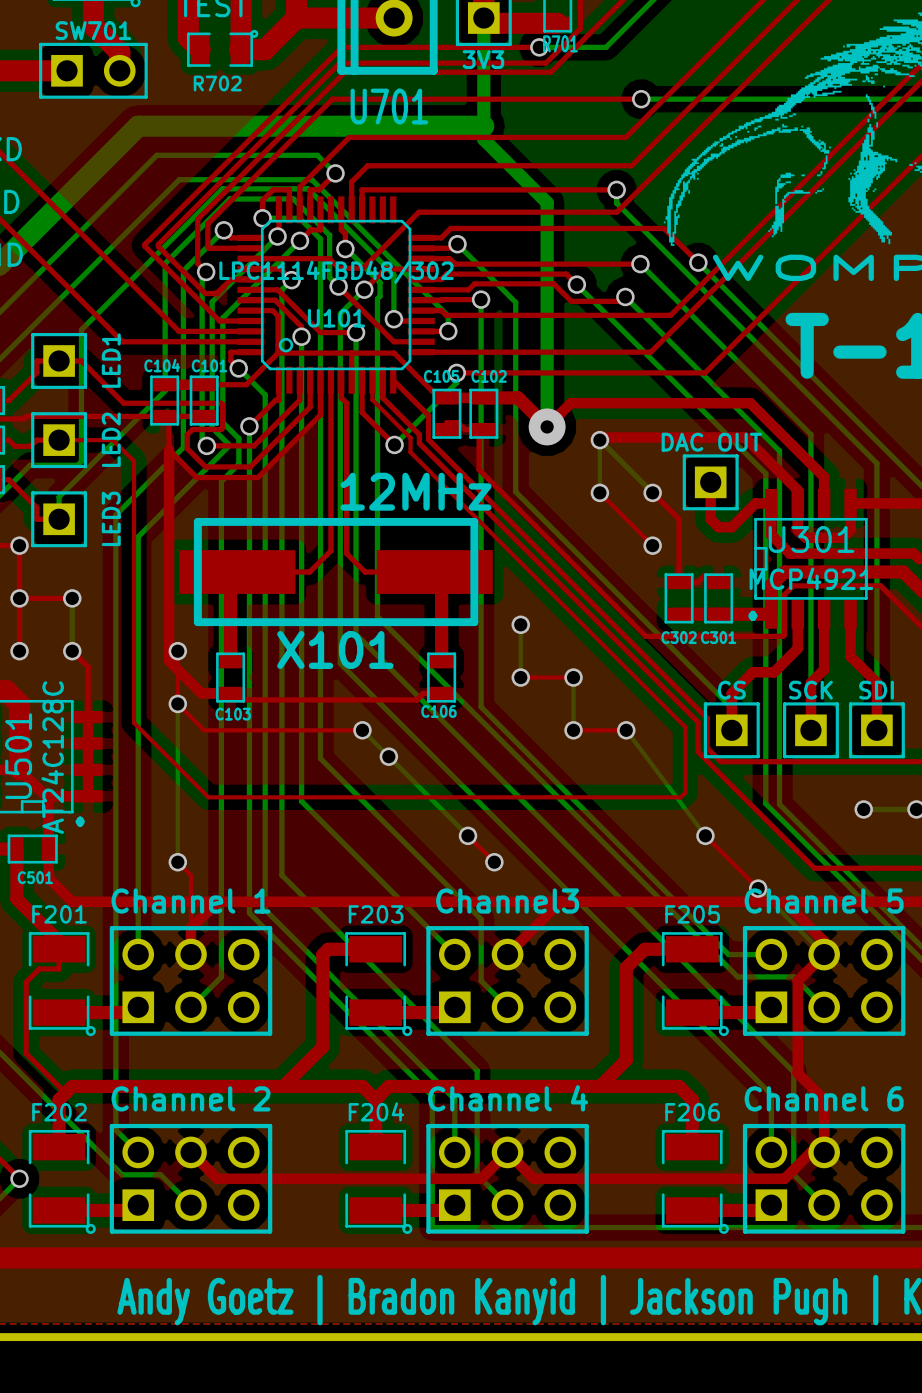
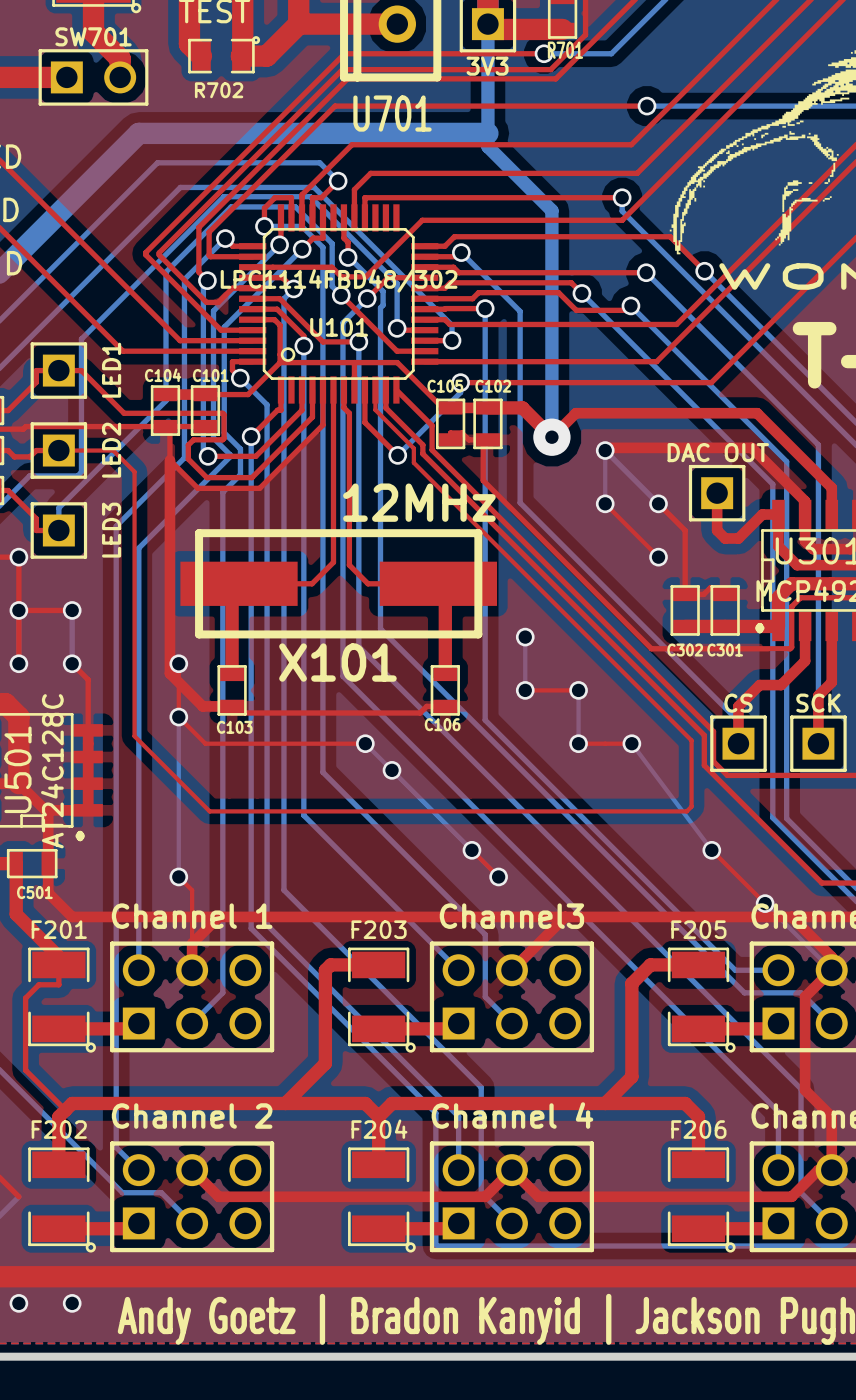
via: (19, 1178) -> none
via: none -> (18, 1303)
via: none -> (72, 1303)

